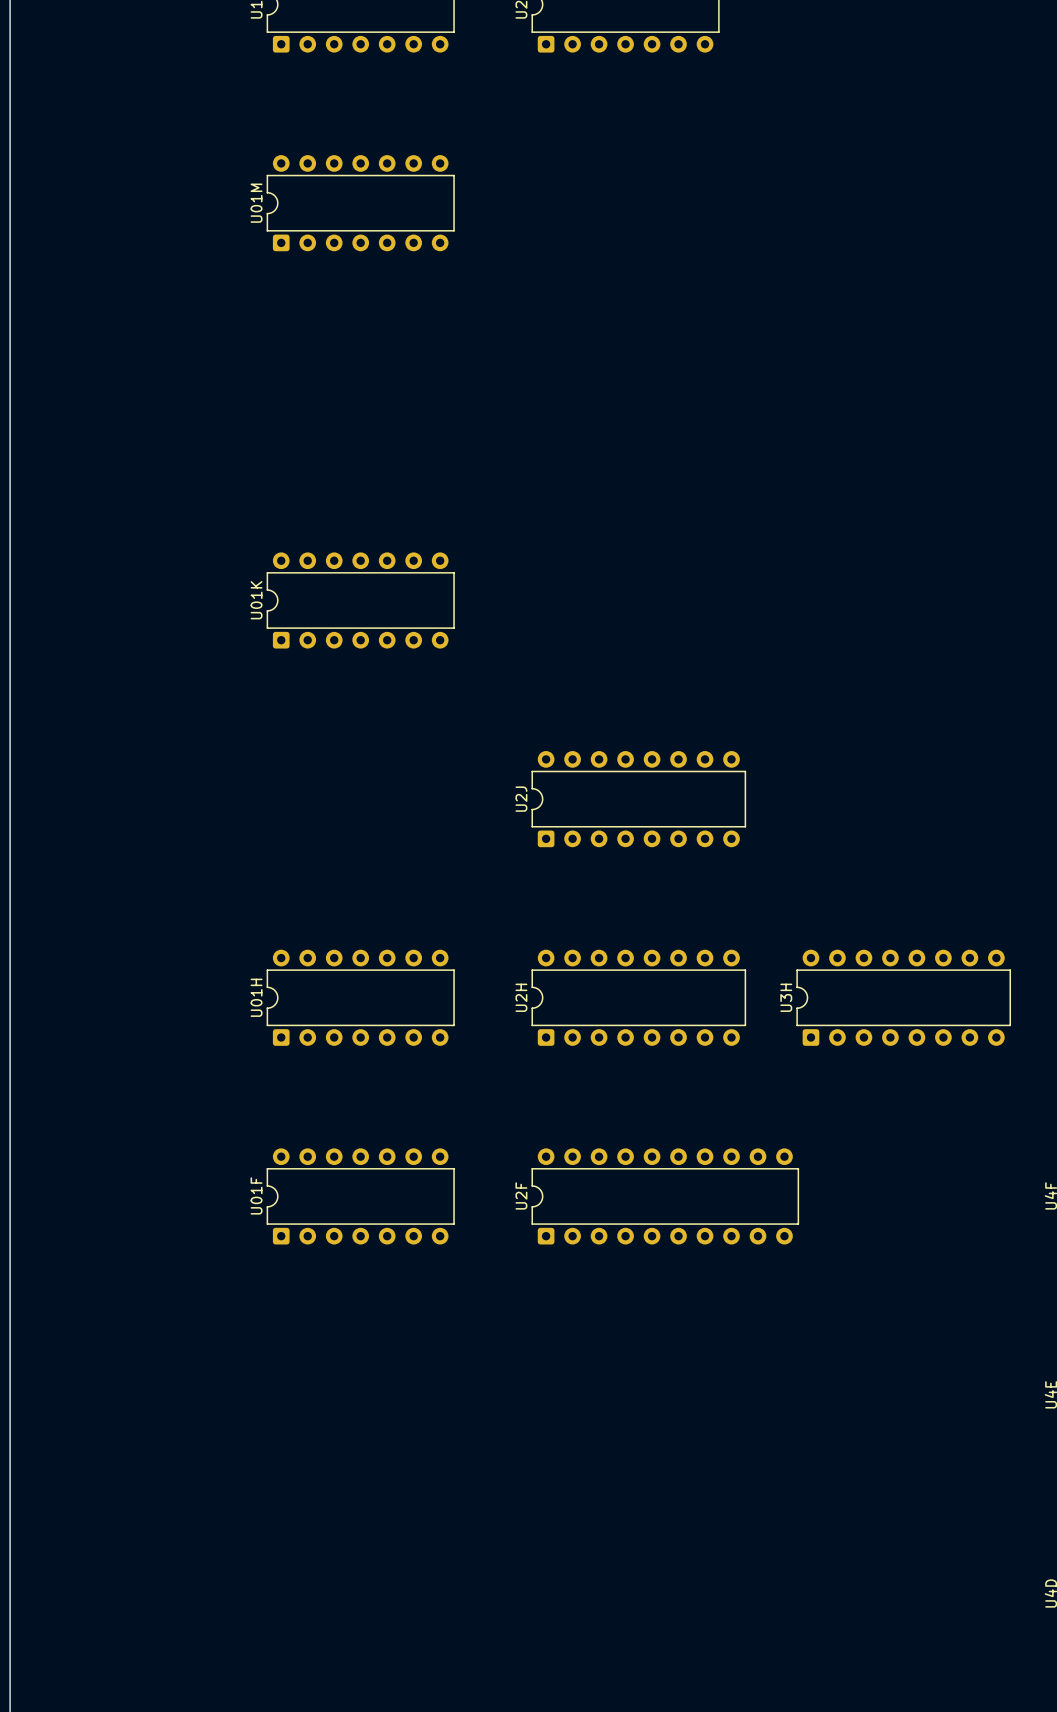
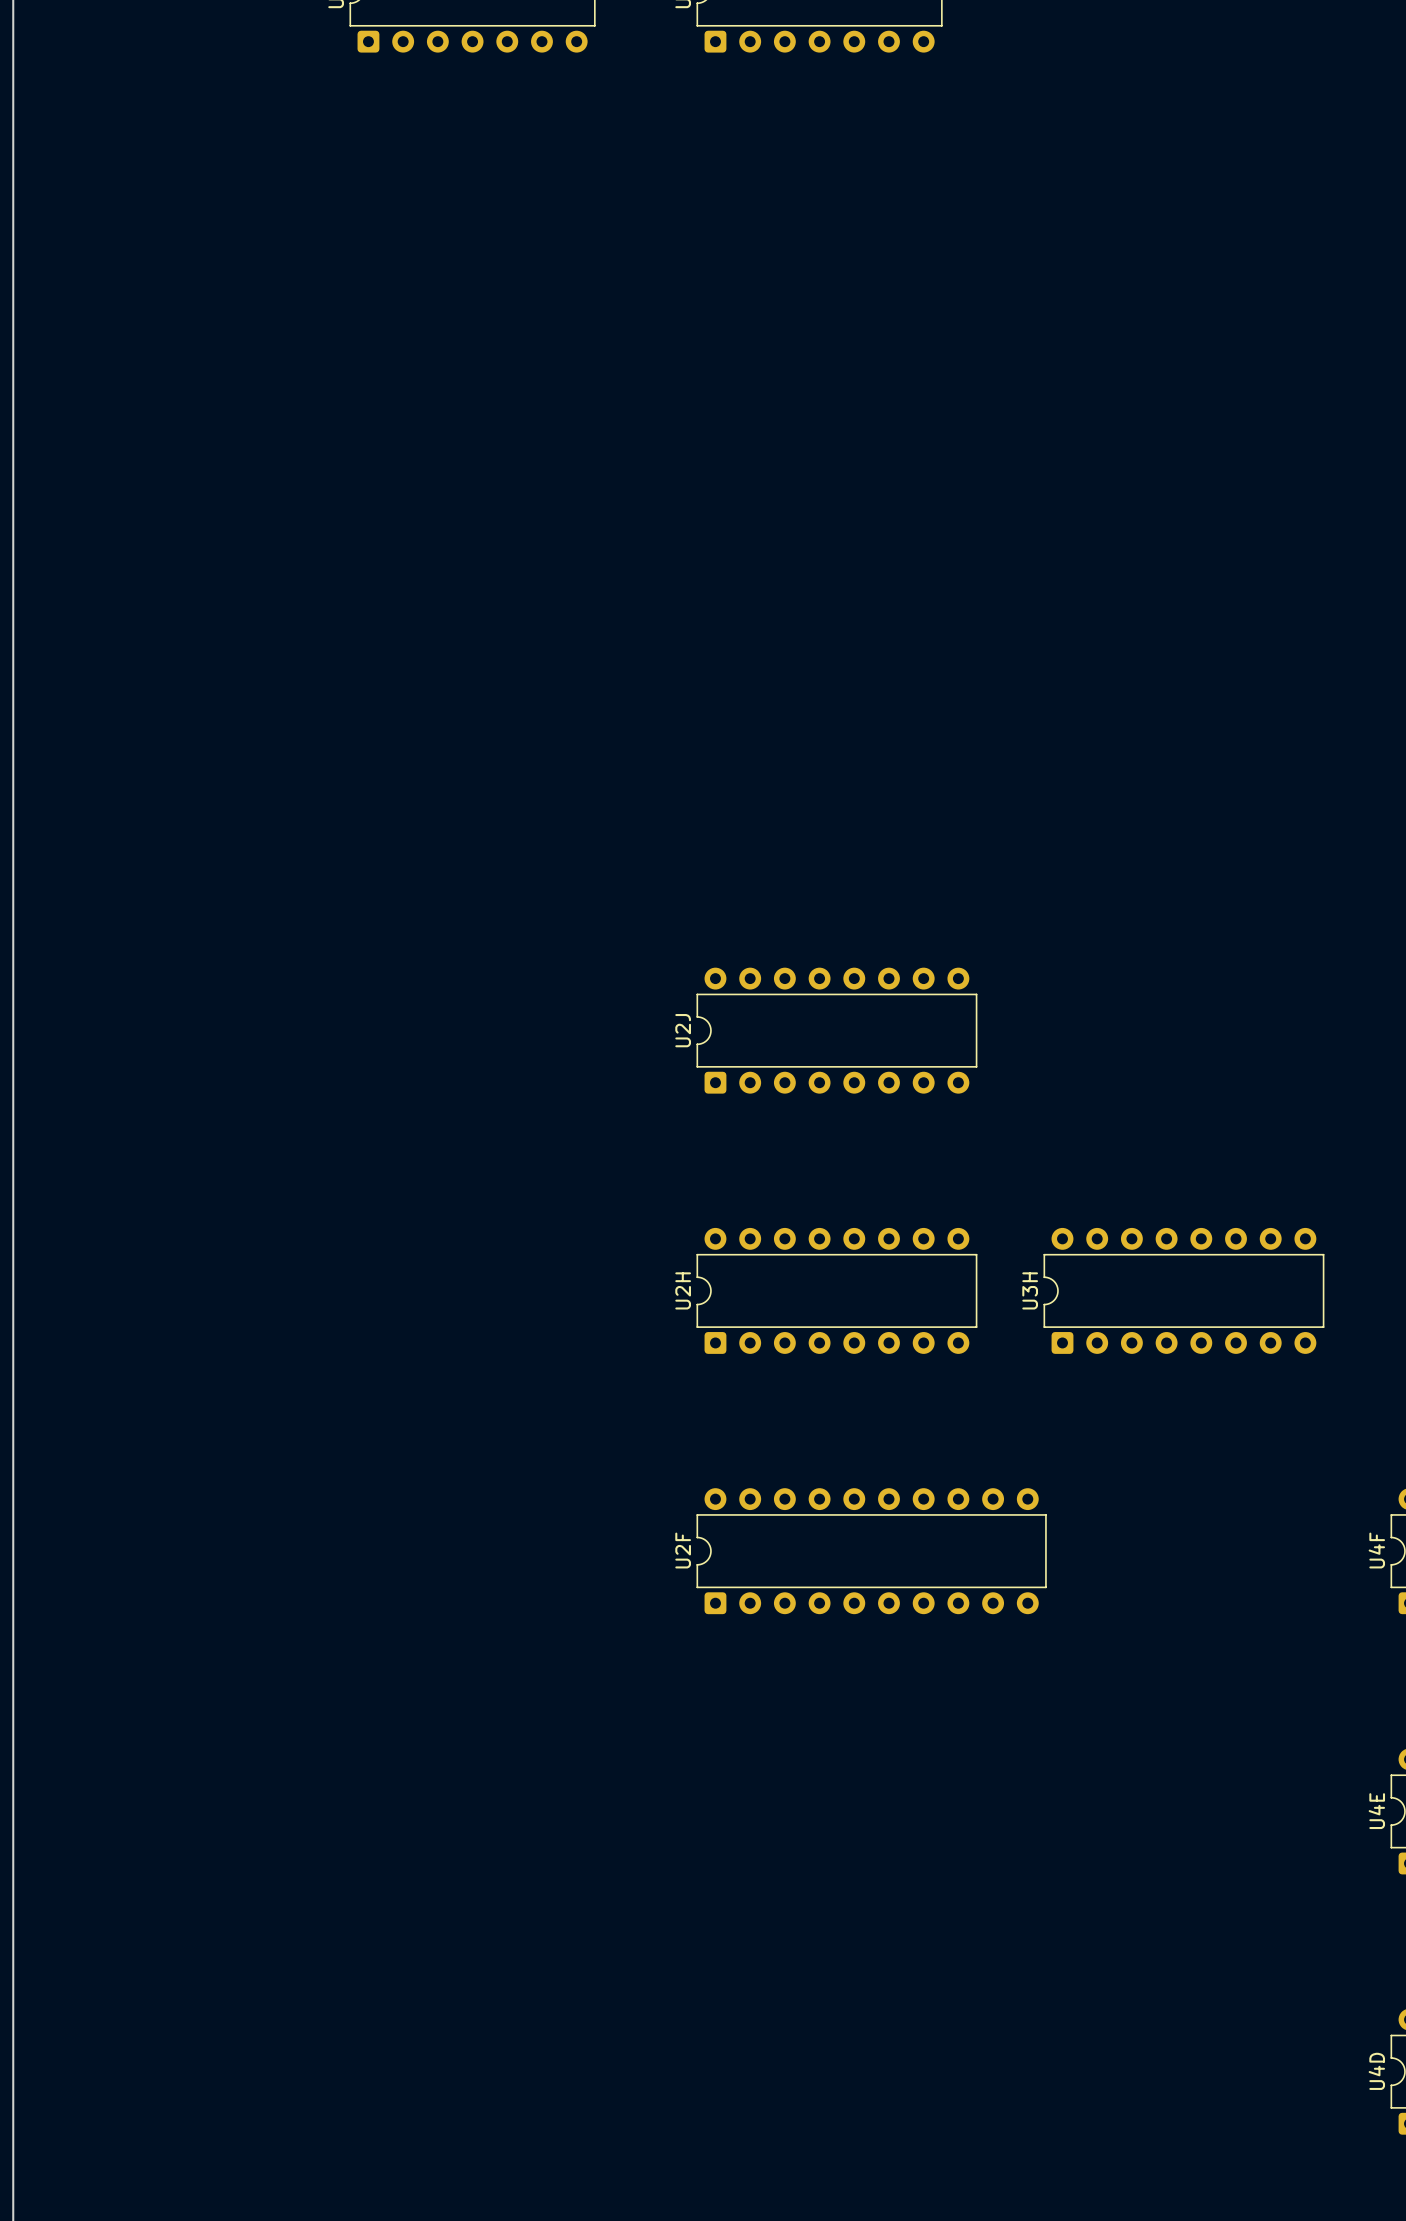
U01M: (360, 203) -> none
U01K: (360, 600) -> none
U01H: (360, 997) -> none
U01F: (360, 1196) -> none

